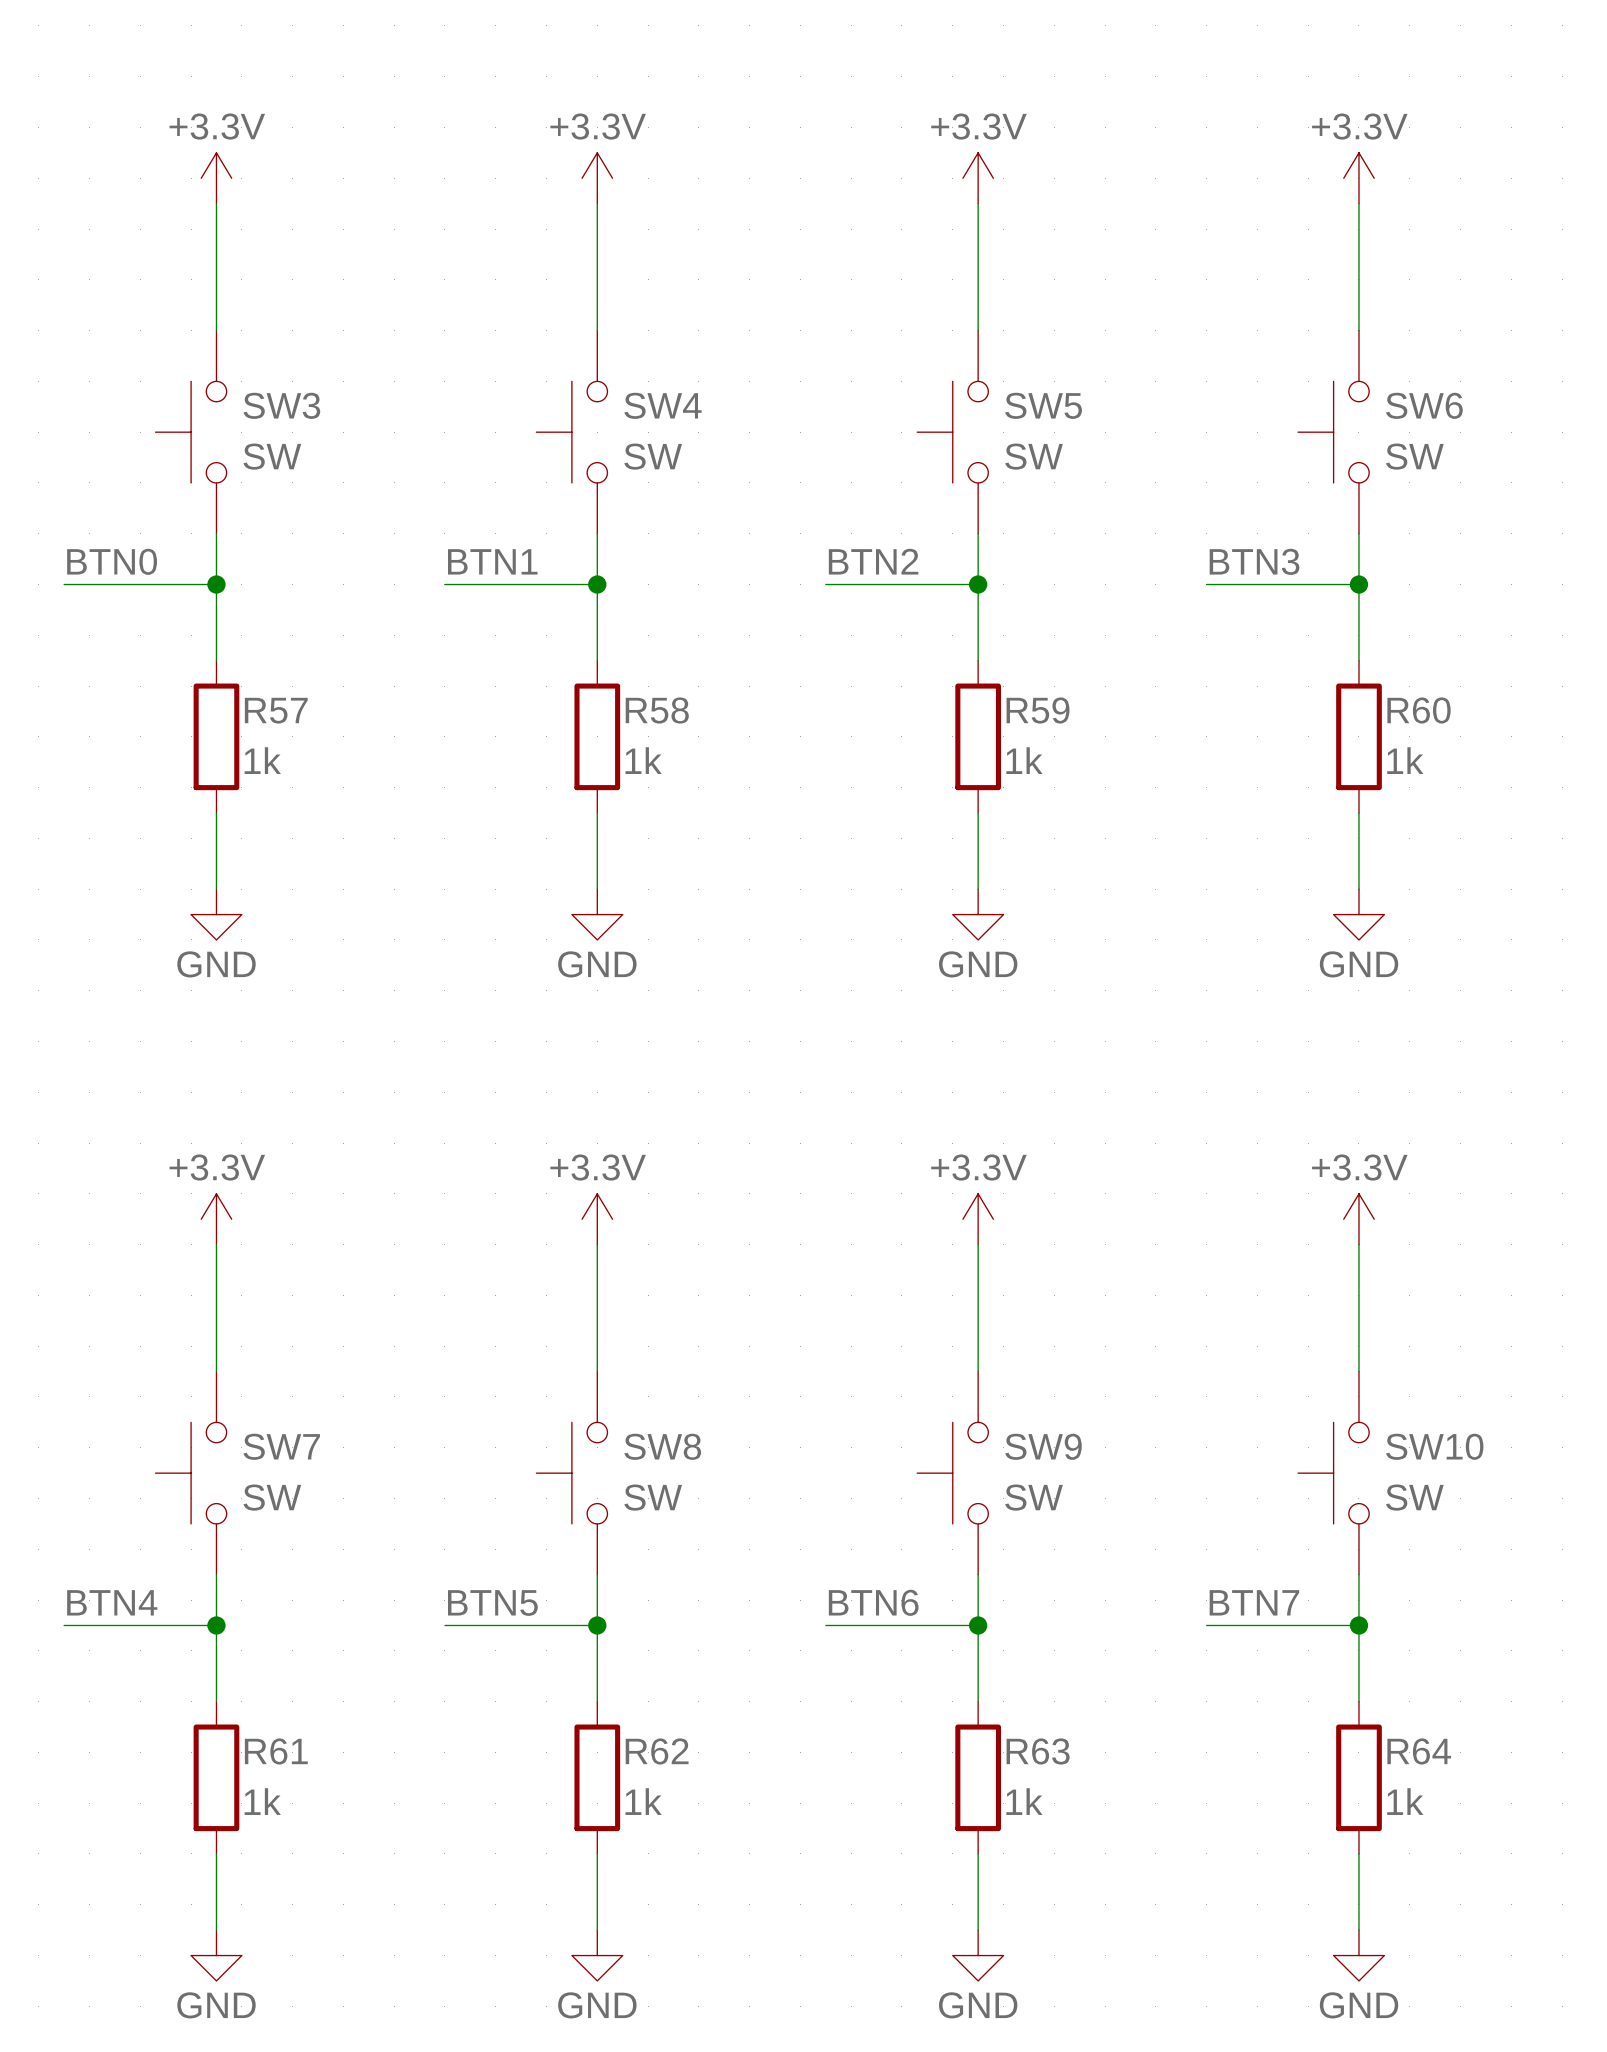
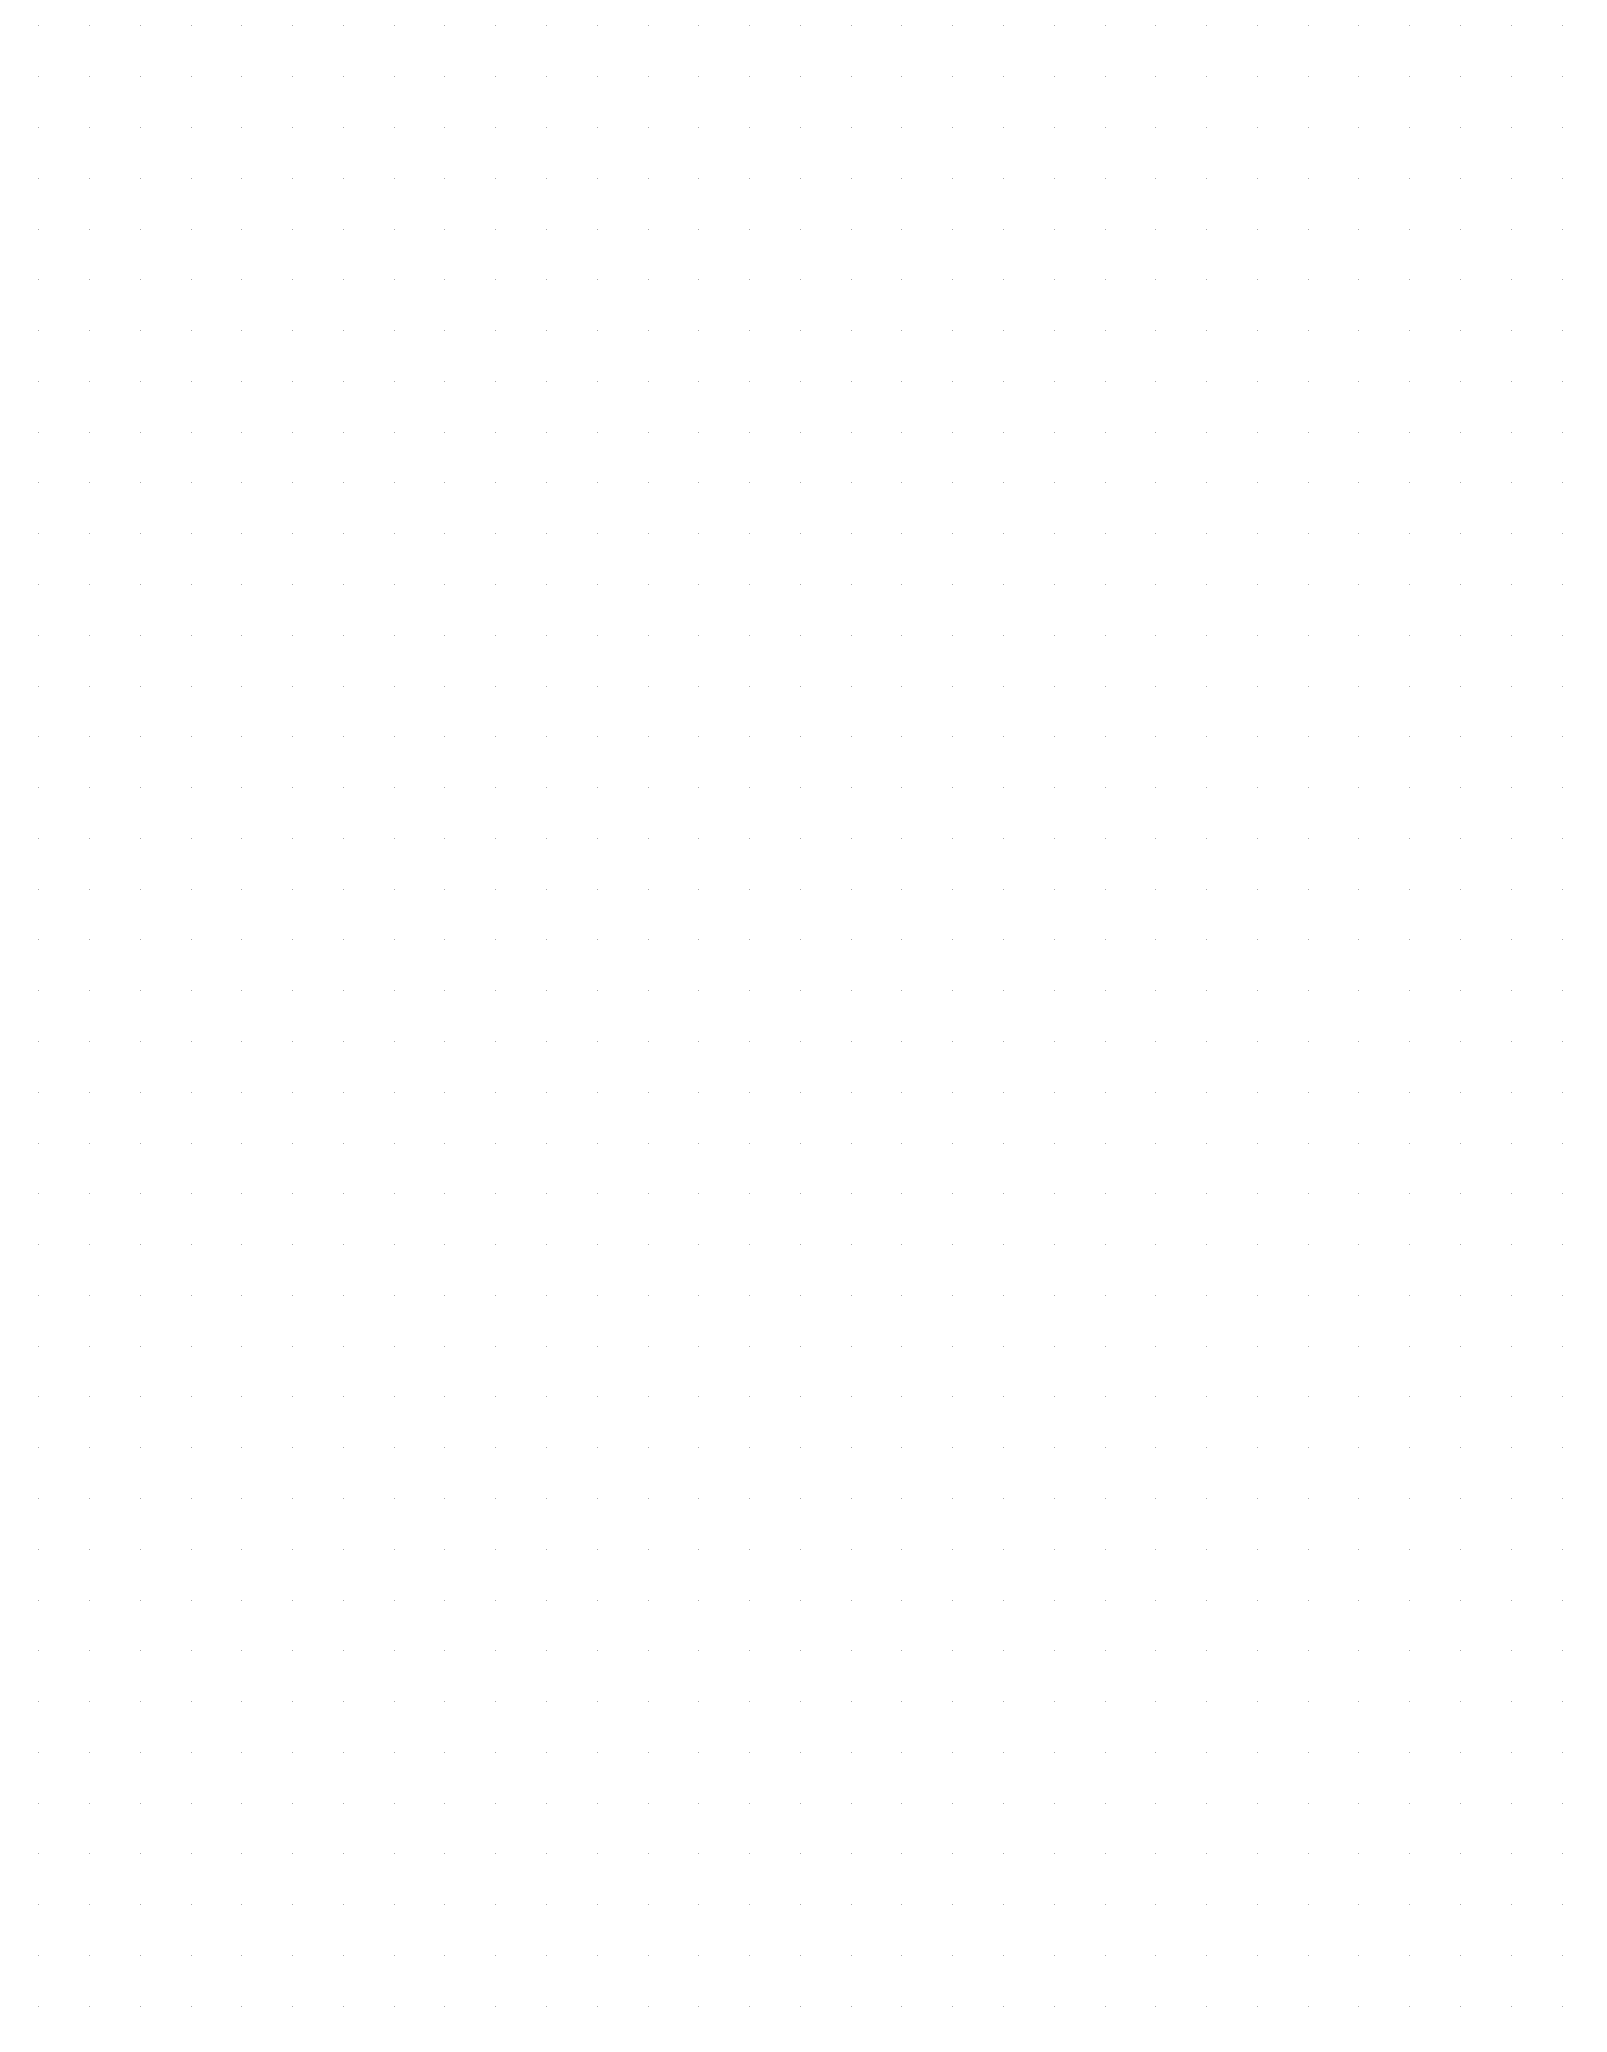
power symbol: +3.3V (216, 178) -> none
power symbol: +3.3V (597, 178) -> none
power symbol: +3.3V (978, 178) -> none
power symbol: +3.3V (1358, 178) -> none
wire: (216, 203) (216, 330) -> none
wire: (597, 203) (597, 330) -> none
wire: (978, 203) (978, 330) -> none
wire: (1358, 203) (1358, 330) -> none
SW3: SW (191, 432) -> none
SW4: SW (571, 432) -> none
SW5: SW (952, 432) -> none
SW6: SW (1333, 432) -> none
wire: (216, 533) (216, 660) -> none
wire: (597, 533) (597, 660) -> none
wire: (978, 533) (978, 660) -> none
wire: (1358, 533) (1358, 660) -> none
label: BTN0 (112, 561) -> none
label: BTN1 (492, 561) -> none
label: BTN2 (873, 561) -> none
label: BTN3 (1254, 561) -> none
wire: (64, 584) (216, 584) -> none
junction: (216, 584) -> none
wire: (444, 584) (597, 584) -> none
junction: (597, 584) -> none
wire: (825, 584) (978, 584) -> none
junction: (978, 584) -> none
wire: (1206, 584) (1358, 584) -> none
junction: (1358, 584) -> none
R57: 1k (216, 736) -> none
R58: 1k (597, 736) -> none
R59: 1k (978, 736) -> none
R60: 1k (1358, 736) -> none
wire: (216, 813) (216, 889) -> none
wire: (597, 813) (597, 889) -> none
wire: (978, 813) (978, 889) -> none
wire: (1358, 813) (1358, 889) -> none
power symbol: GND (216, 914) -> none
power symbol: GND (597, 914) -> none
power symbol: GND (978, 914) -> none
power symbol: GND (1358, 914) -> none
power symbol: +3.3V (216, 1219) -> none
power symbol: +3.3V (597, 1219) -> none
power symbol: +3.3V (978, 1219) -> none
power symbol: +3.3V (1358, 1219) -> none
wire: (216, 1244) (216, 1371) -> none
wire: (597, 1244) (597, 1371) -> none
wire: (978, 1244) (978, 1371) -> none
wire: (1358, 1244) (1358, 1371) -> none
SW7: SW (191, 1473) -> none
SW8: SW (571, 1473) -> none
SW9: SW (952, 1473) -> none
SW10: SW (1333, 1473) -> none
wire: (216, 1574) (216, 1701) -> none
wire: (597, 1574) (597, 1701) -> none
wire: (978, 1574) (978, 1701) -> none
wire: (1358, 1574) (1358, 1701) -> none
label: BTN4 (112, 1602) -> none
label: BTN6 (873, 1602) -> none
label: BTN7 (1254, 1602) -> none
label: BTN5 (492, 1603) -> none
wire: (64, 1625) (216, 1625) -> none
junction: (216, 1625) -> none
wire: (444, 1625) (597, 1625) -> none
junction: (597, 1625) -> none
wire: (825, 1625) (978, 1625) -> none
junction: (978, 1625) -> none
wire: (1206, 1625) (1358, 1625) -> none
junction: (1358, 1625) -> none
R61: 1k (216, 1777) -> none
R62: 1k (597, 1777) -> none
R63: 1k (978, 1777) -> none
R64: 1k (1358, 1777) -> none
wire: (216, 1853) (216, 1930) -> none
wire: (597, 1853) (597, 1930) -> none
wire: (978, 1853) (978, 1930) -> none
wire: (1358, 1853) (1358, 1930) -> none
power symbol: GND (216, 1955) -> none
power symbol: GND (597, 1955) -> none
power symbol: GND (978, 1955) -> none
power symbol: GND (1358, 1955) -> none

